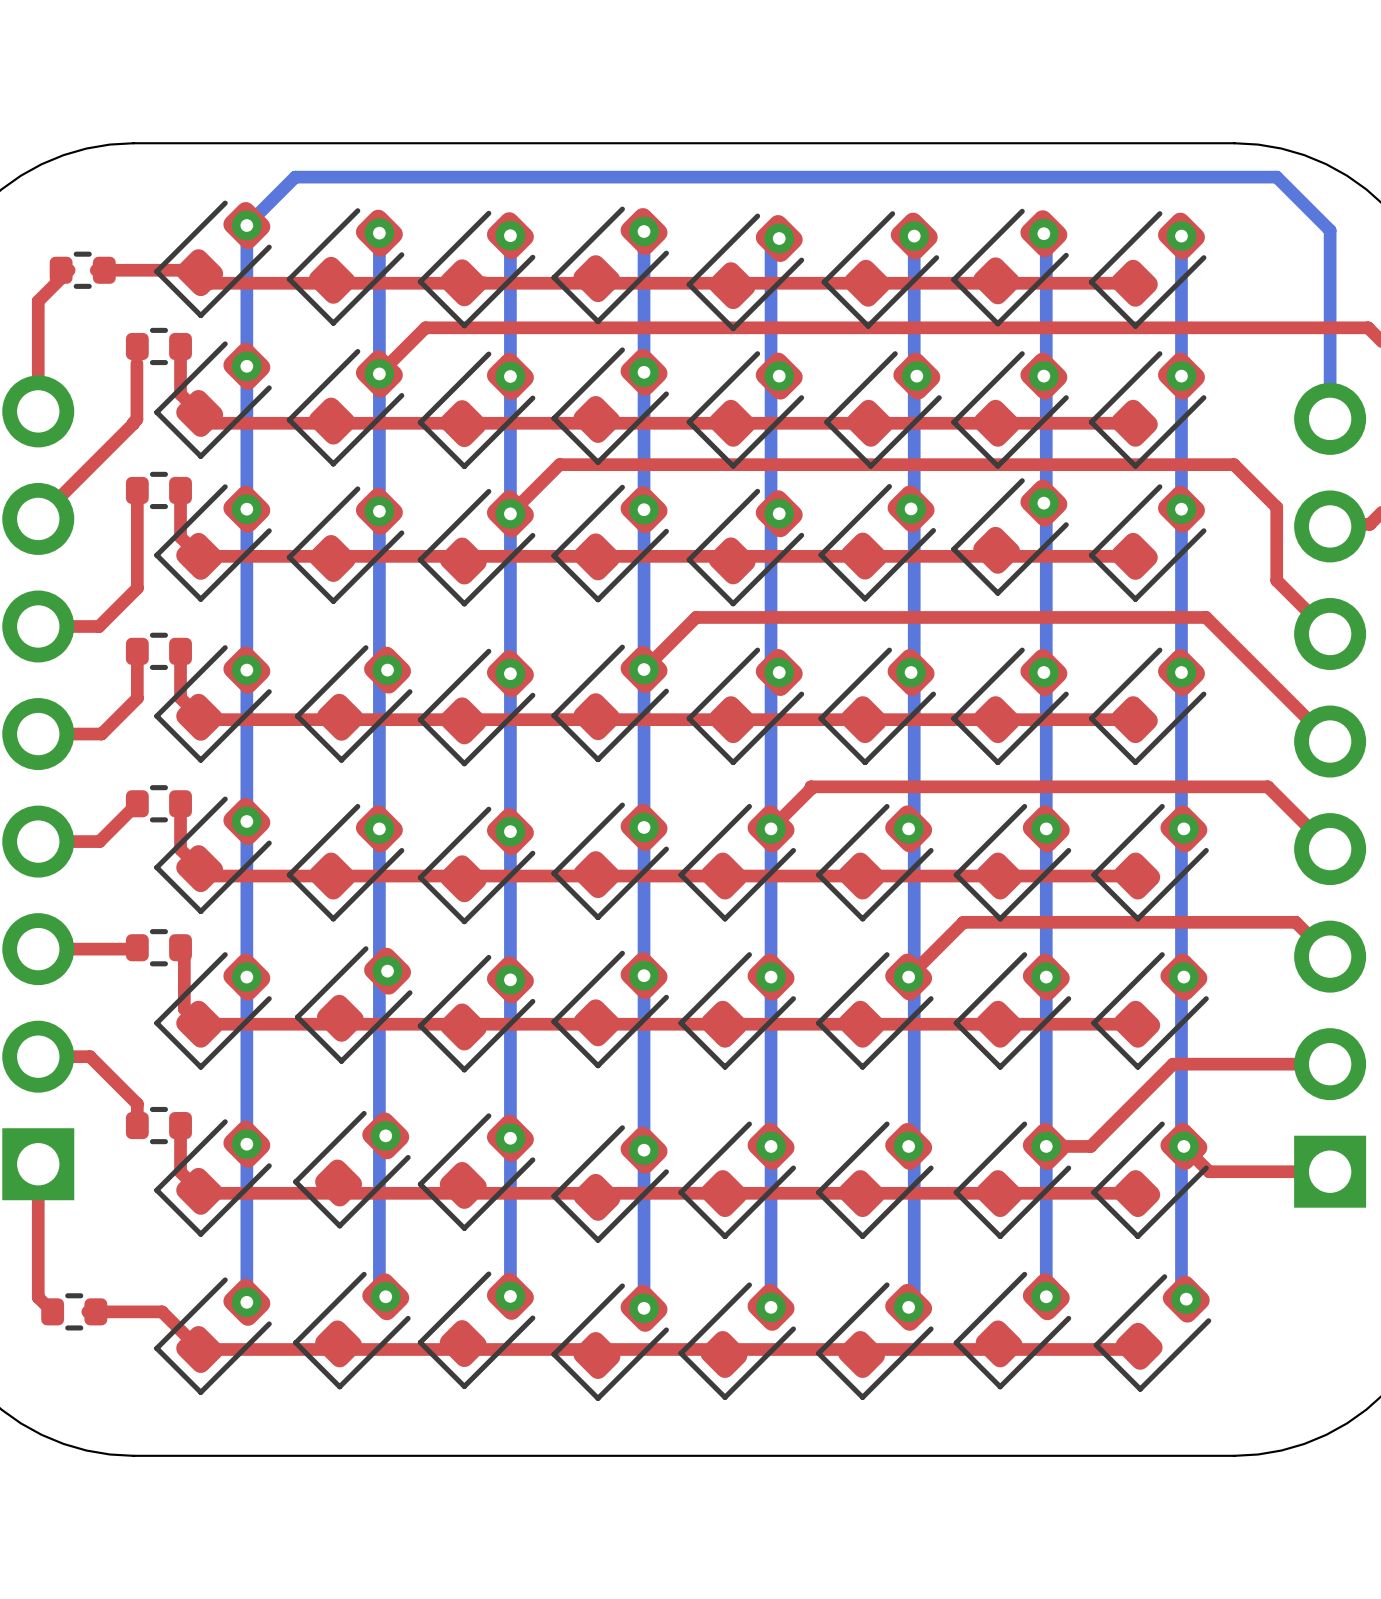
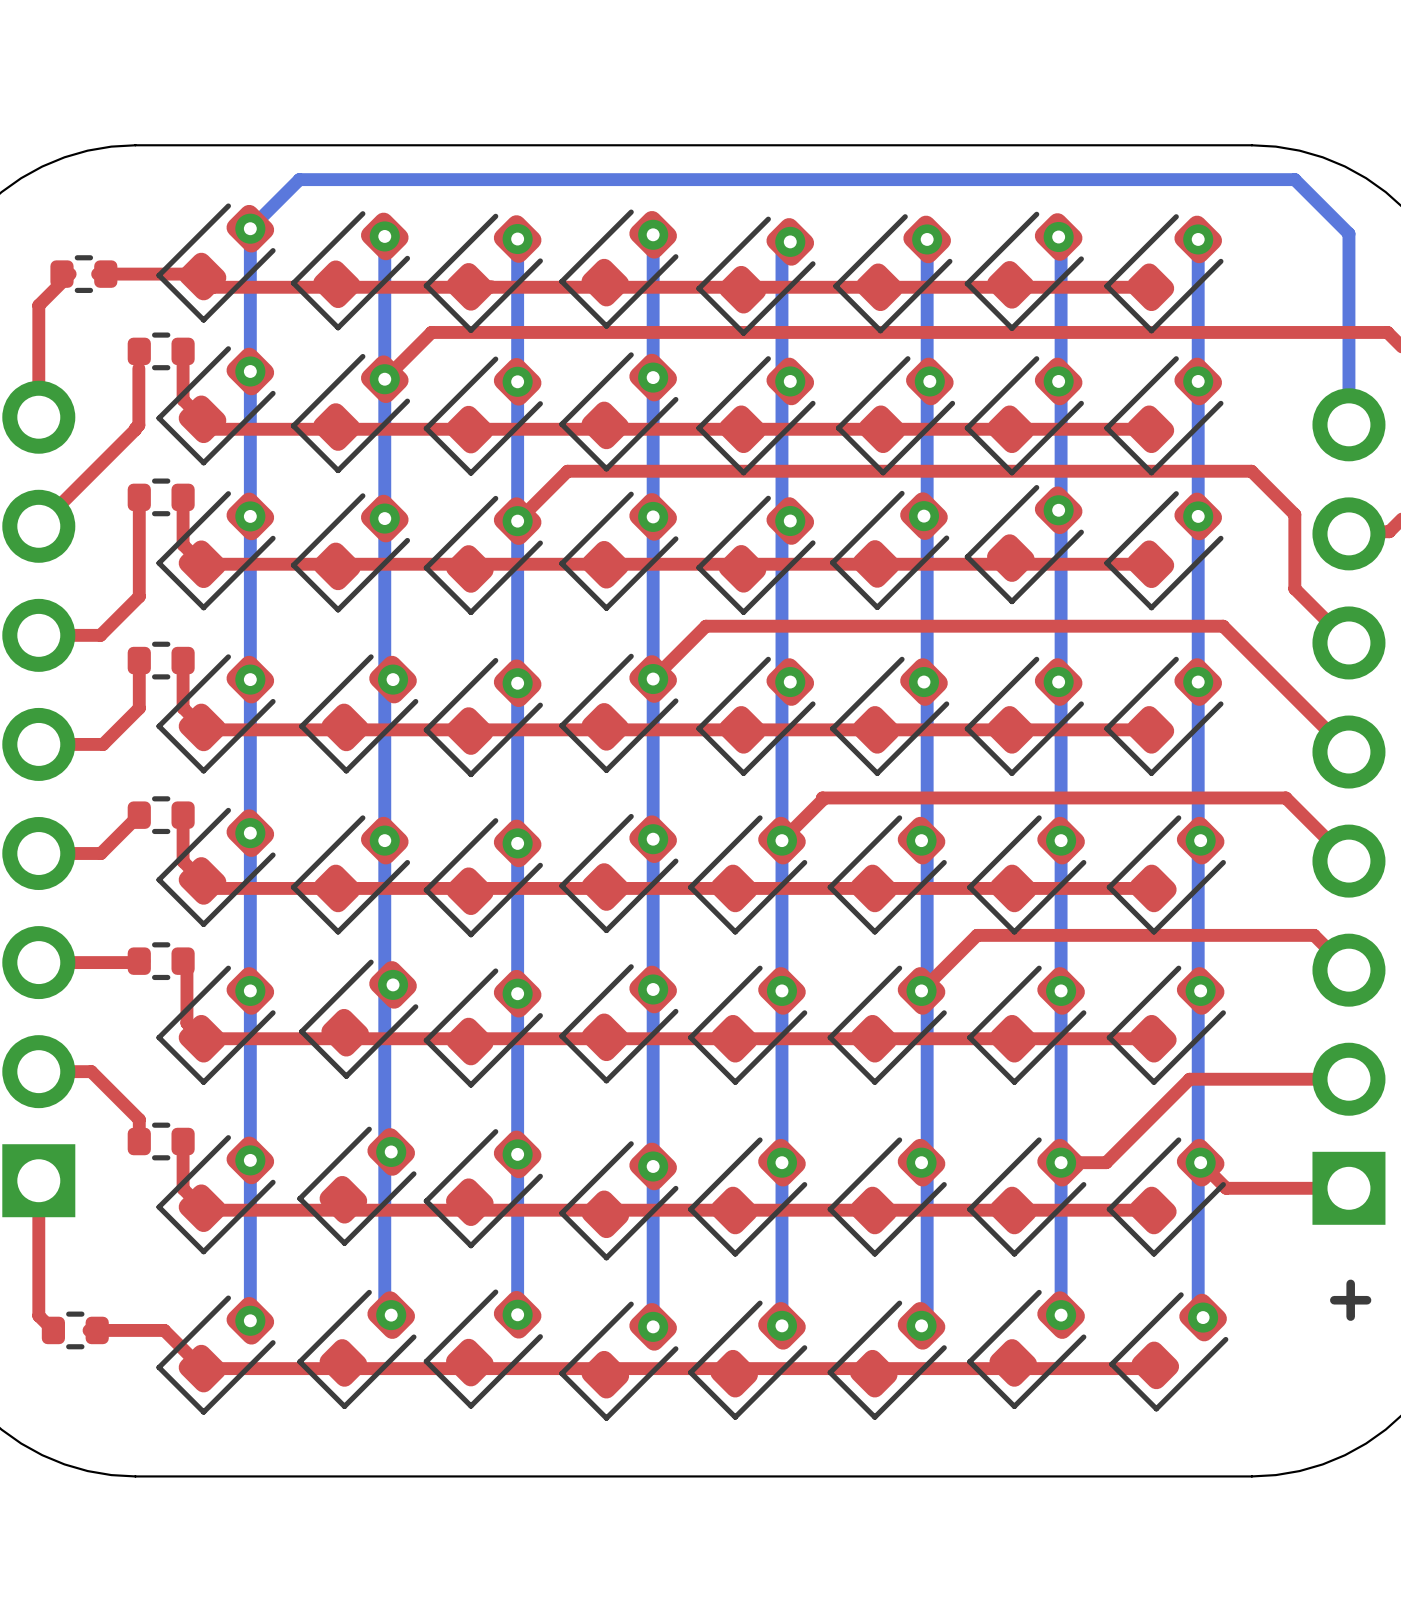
text: none -> + (1350, 1300)

